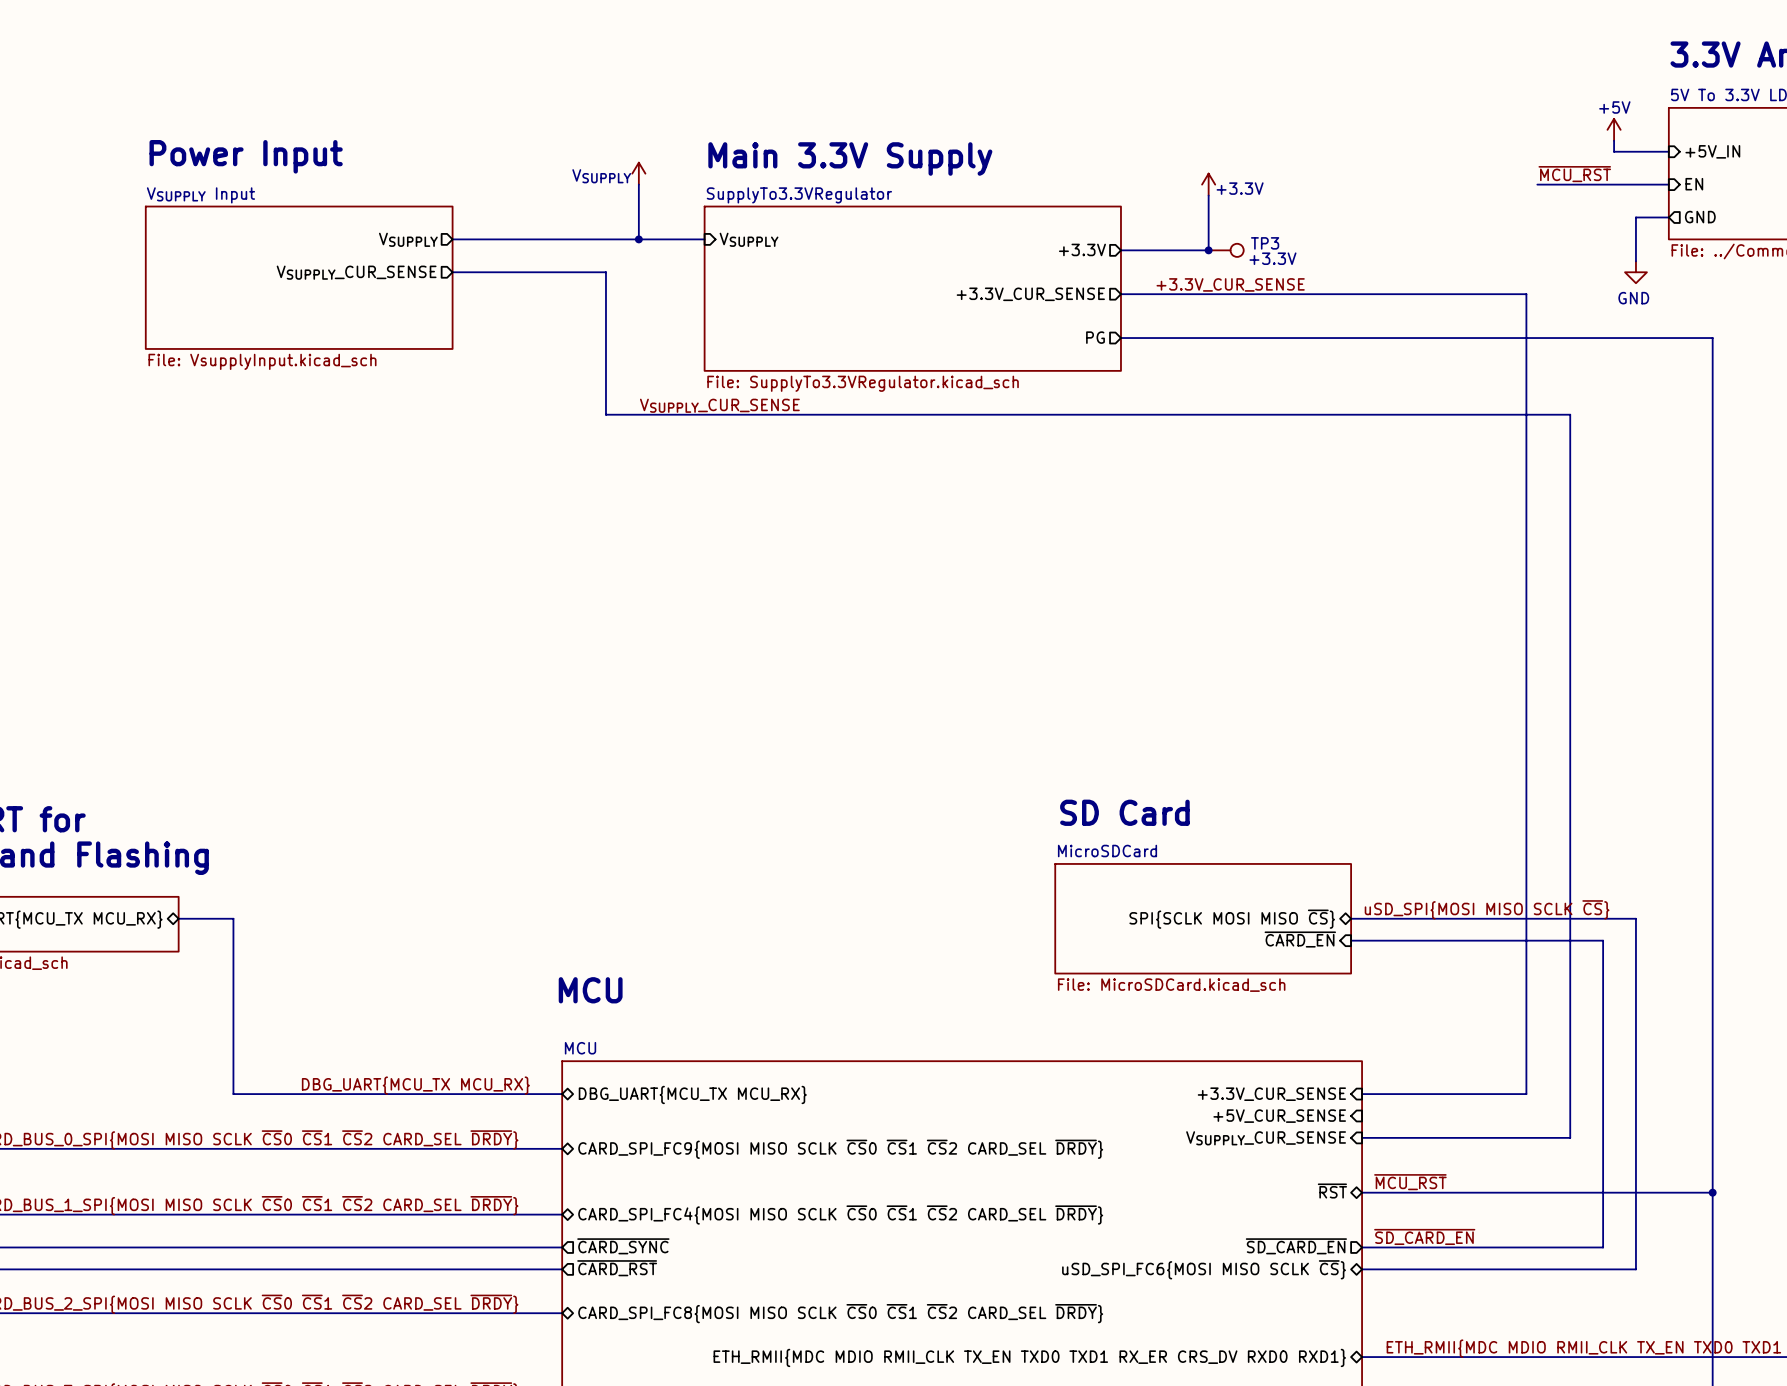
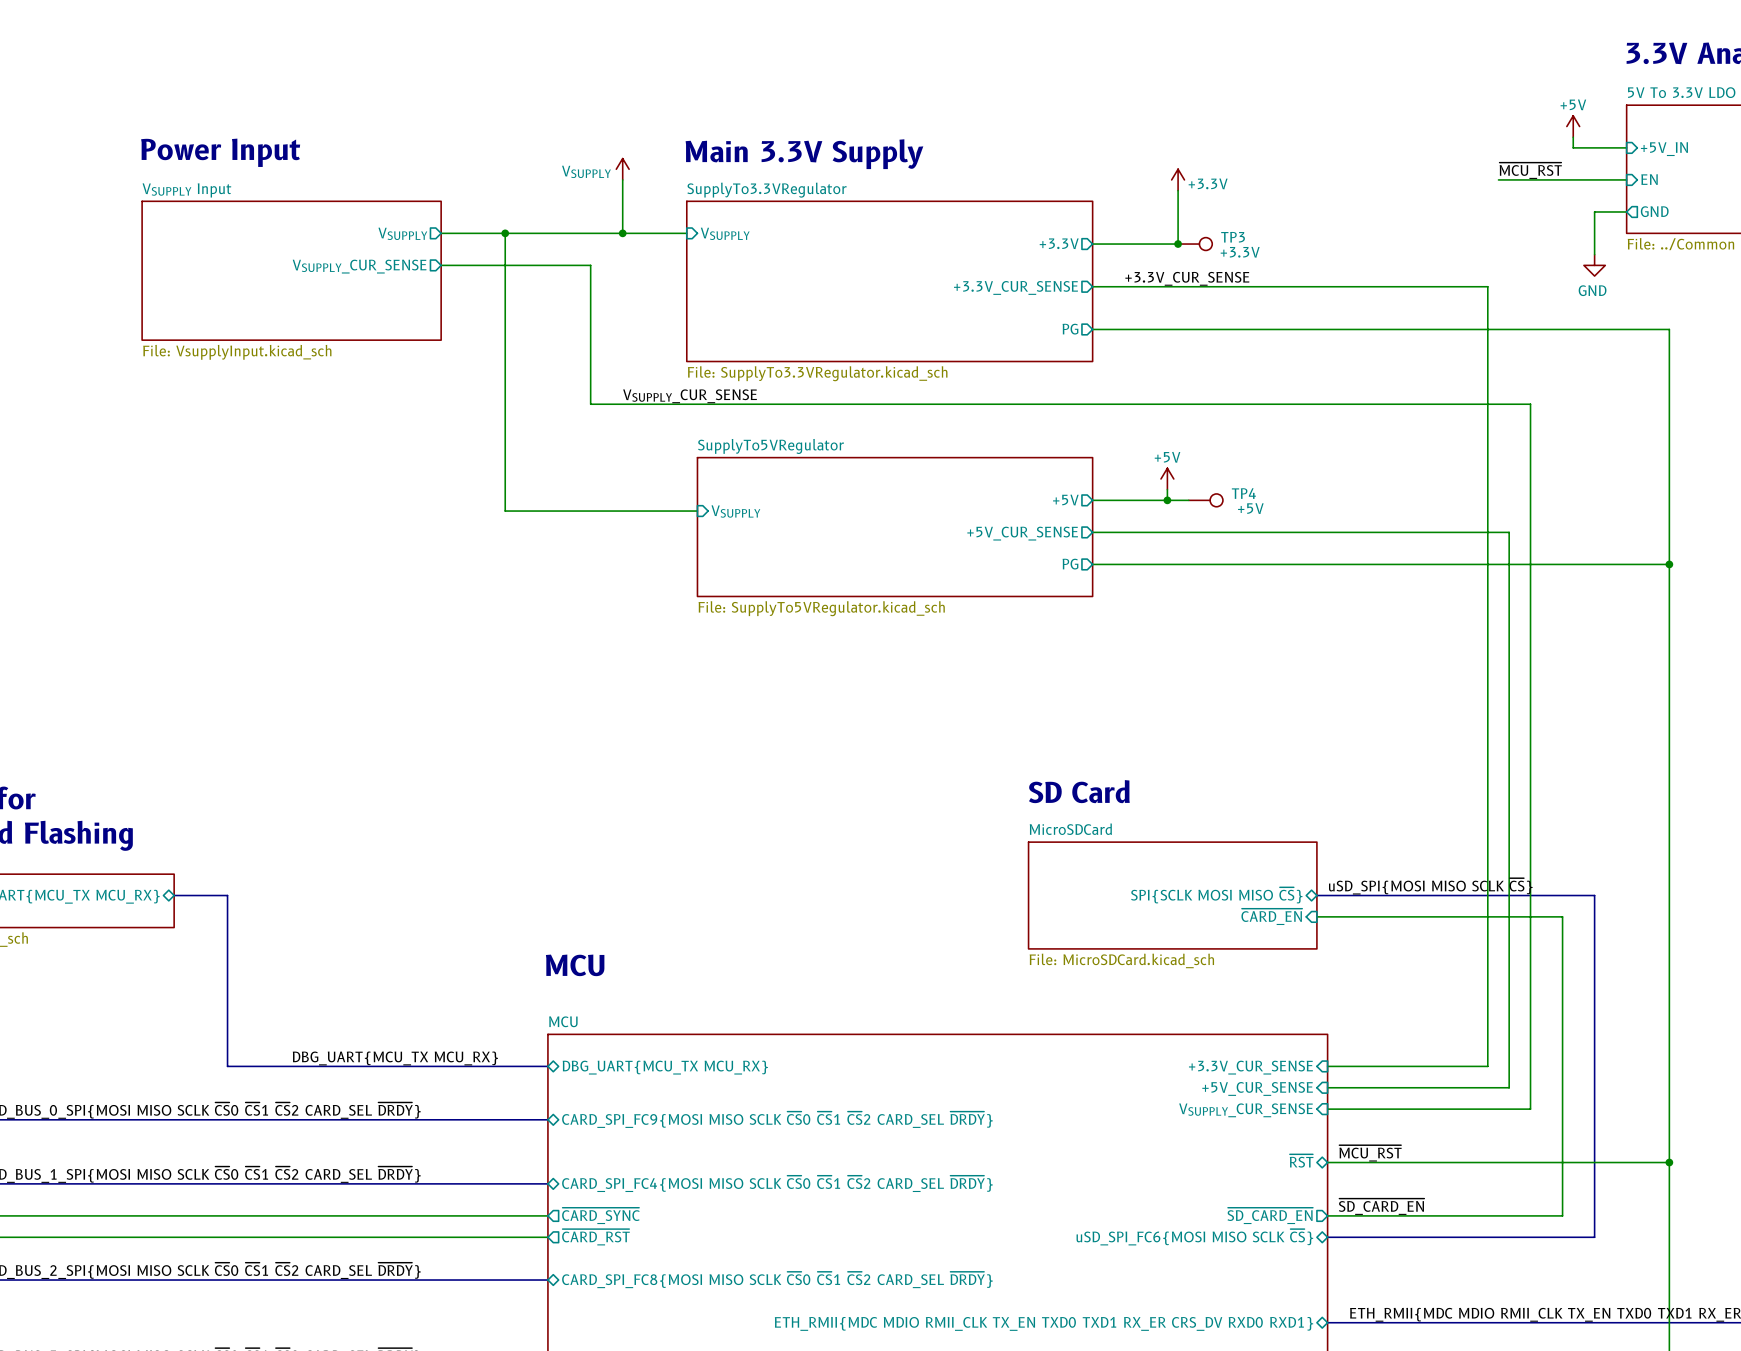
wire: none -> (505, 233) (505, 511) (697, 511)
junction: none -> (505, 233)
power symbol: none -> +5V (1167, 478)
wire: none -> (1167, 489) (1167, 500)
sheet pin: none -> +5V (1065, 500)
wire: none -> (1092, 500) (1188, 500)
junction: none -> (1167, 500)
TP4: none -> +5V (1205, 500)
sheet pin: none -> VSUPPLY (735, 511)
sheet SupplyTo5VRegulator: none -> File: SupplyTo5VRegulator.kicad_sch (895, 527)
sheet pin: none -> +5V_CUR_SENSE (1022, 533)
wire: none -> (1092, 532) (1509, 532) (1509, 1087) (1327, 1087)
sheet pin: none -> PG (1070, 564)
wire: none -> (1092, 564) (1669, 564)
junction: none -> (1669, 564)

